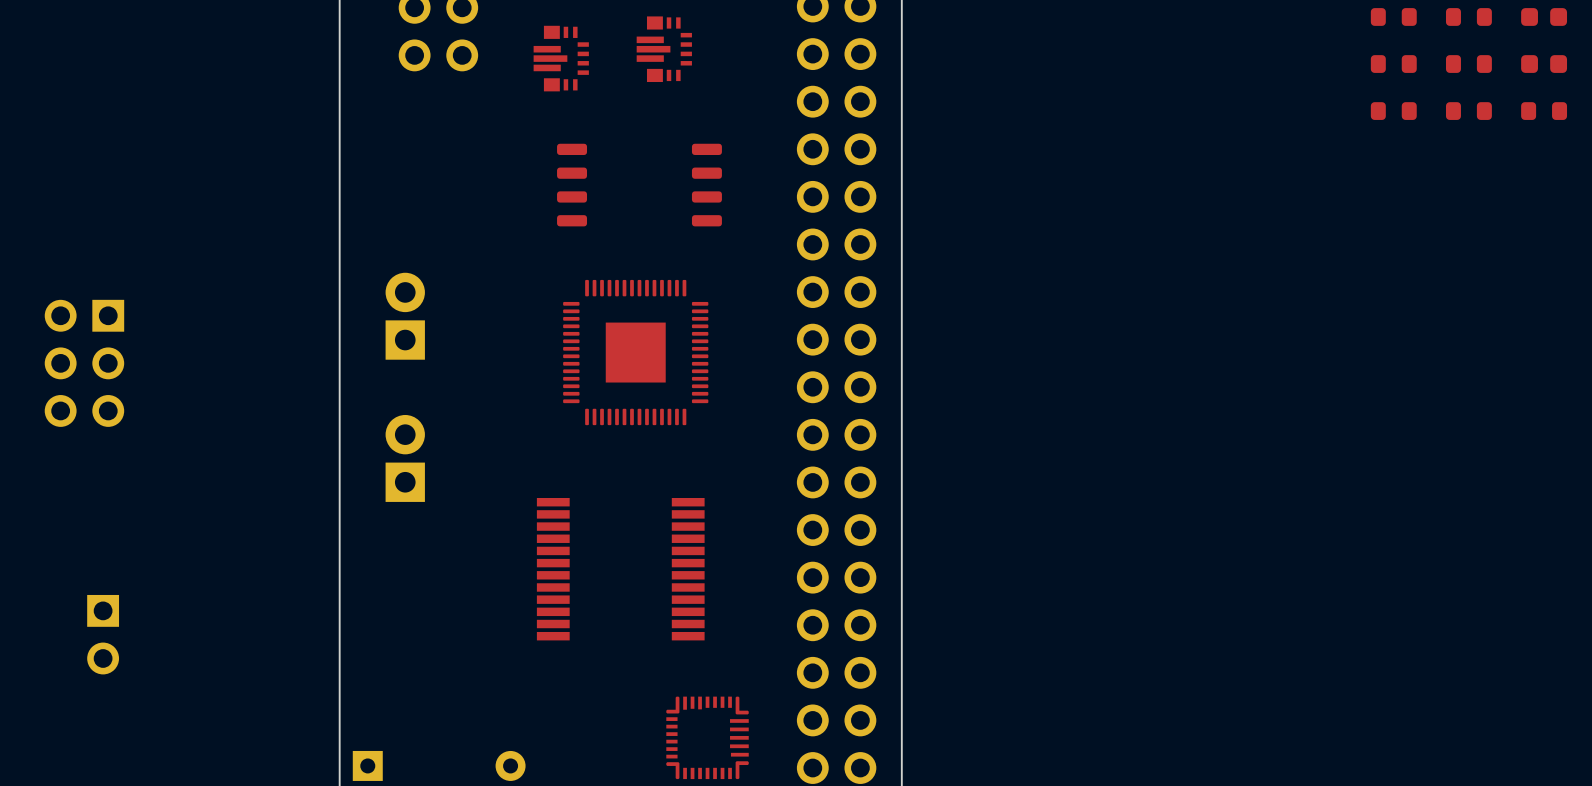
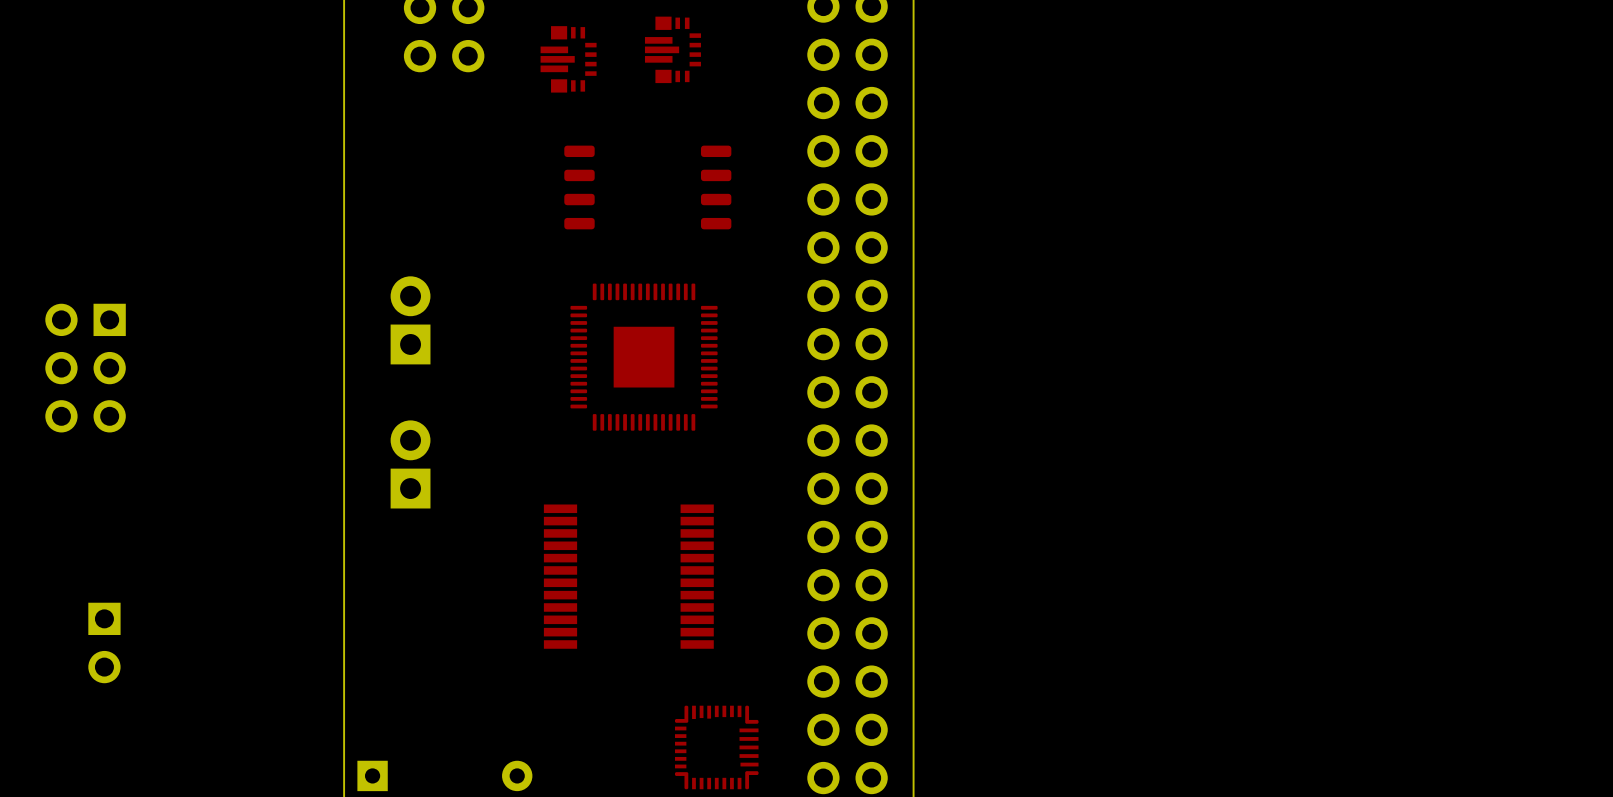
part: (1393, 16) -> none
part: (1468, 16) -> none
part: (1544, 16) -> none
part: (1393, 64) -> none
part: (1468, 64) -> none
part: (1544, 64) -> none
part: (1393, 111) -> none
part: (1468, 111) -> none
part: (1544, 111) -> none

